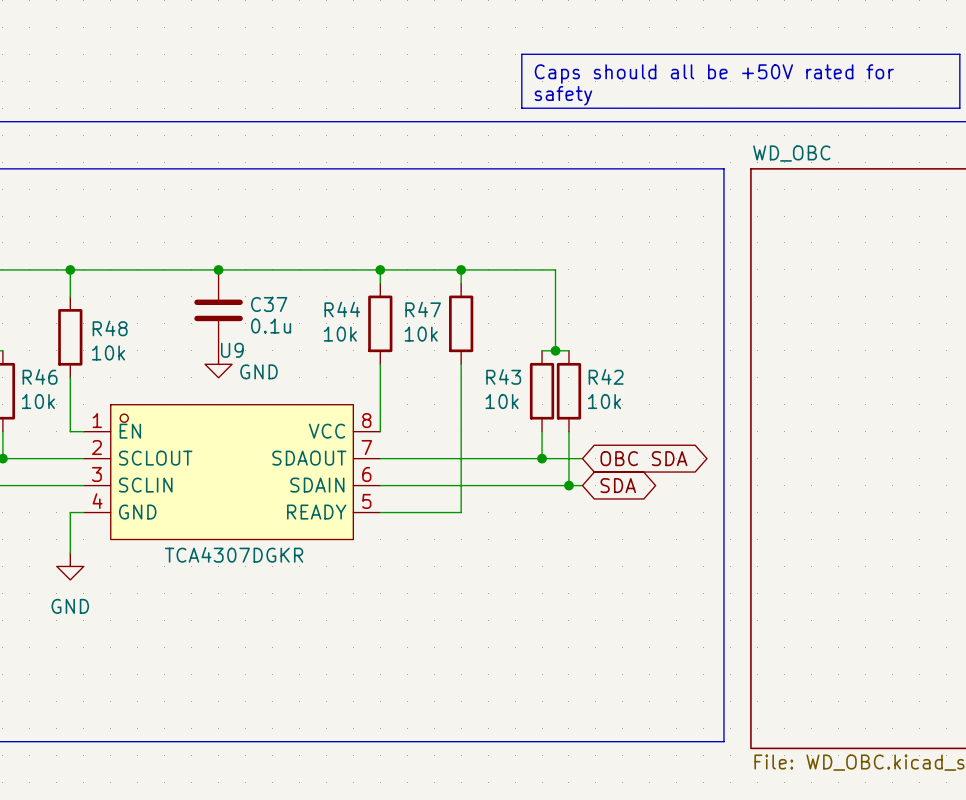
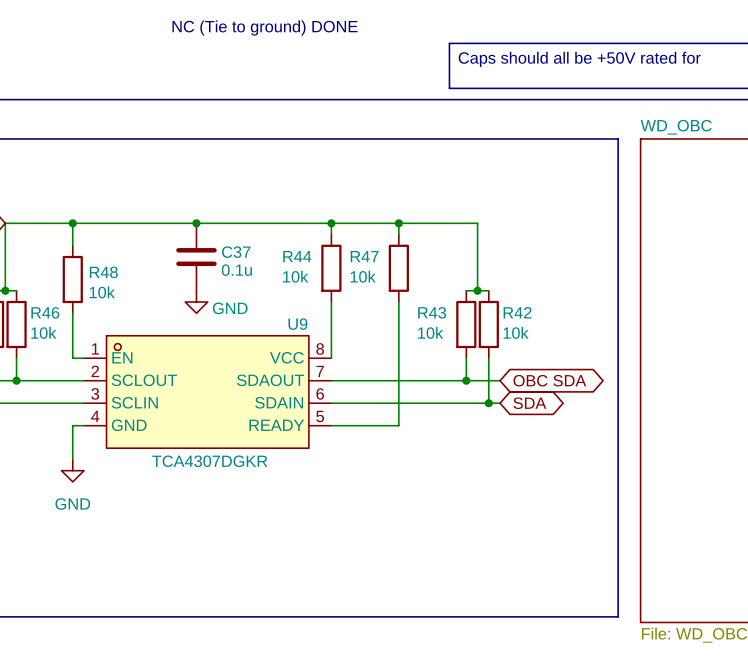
text: none -> NC (Tie to ground) DONE (265, 28)
text: safety (563, 95) -> none
U9 name position: U9 (232, 350) -> U9 (297, 324)

